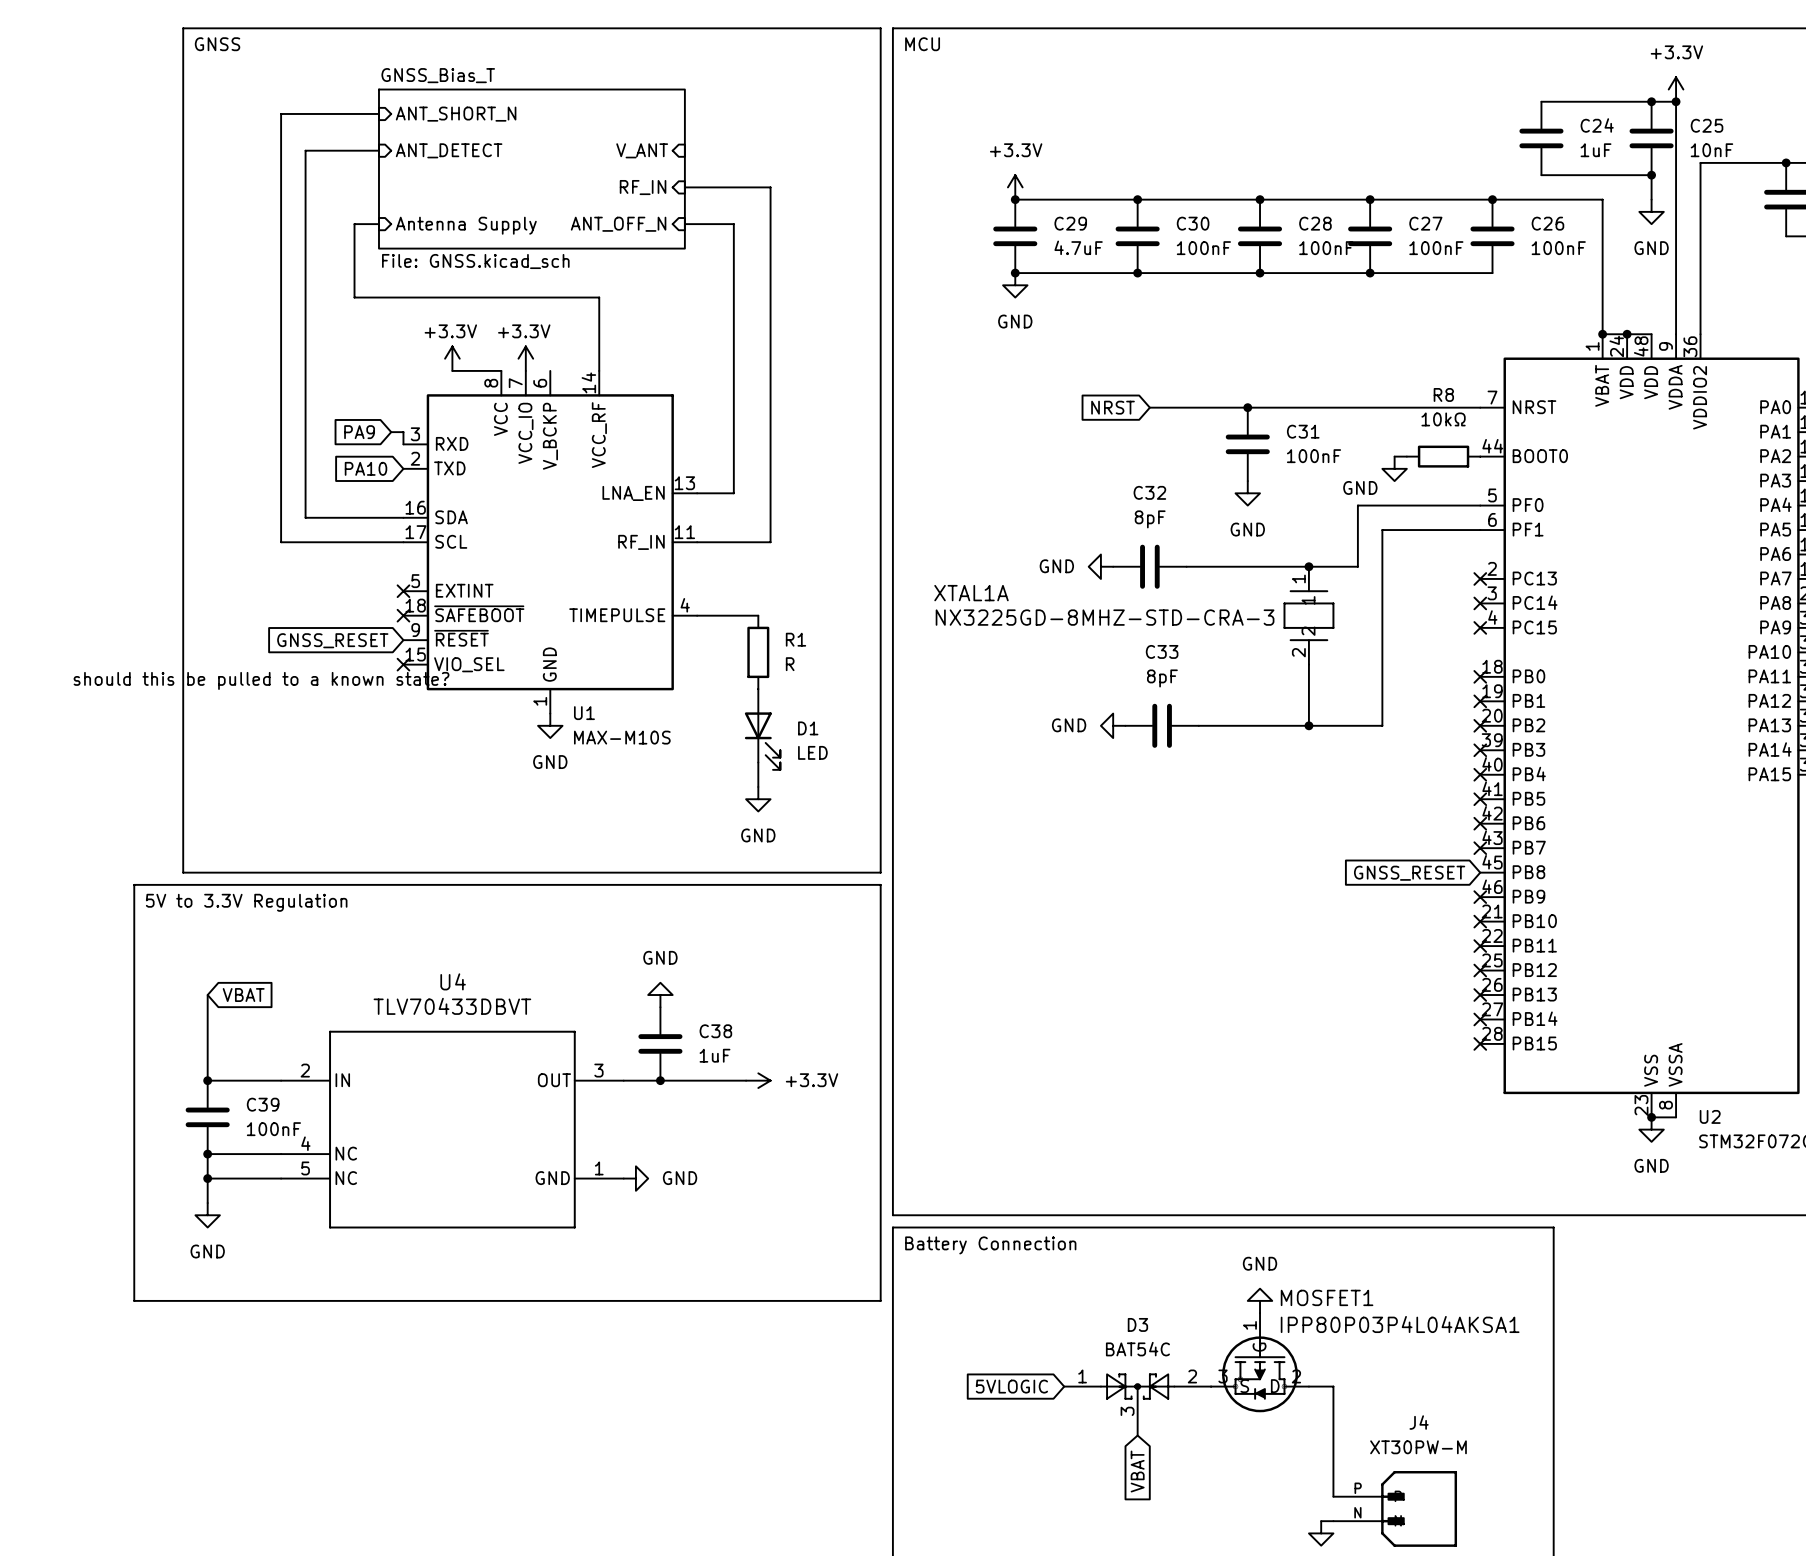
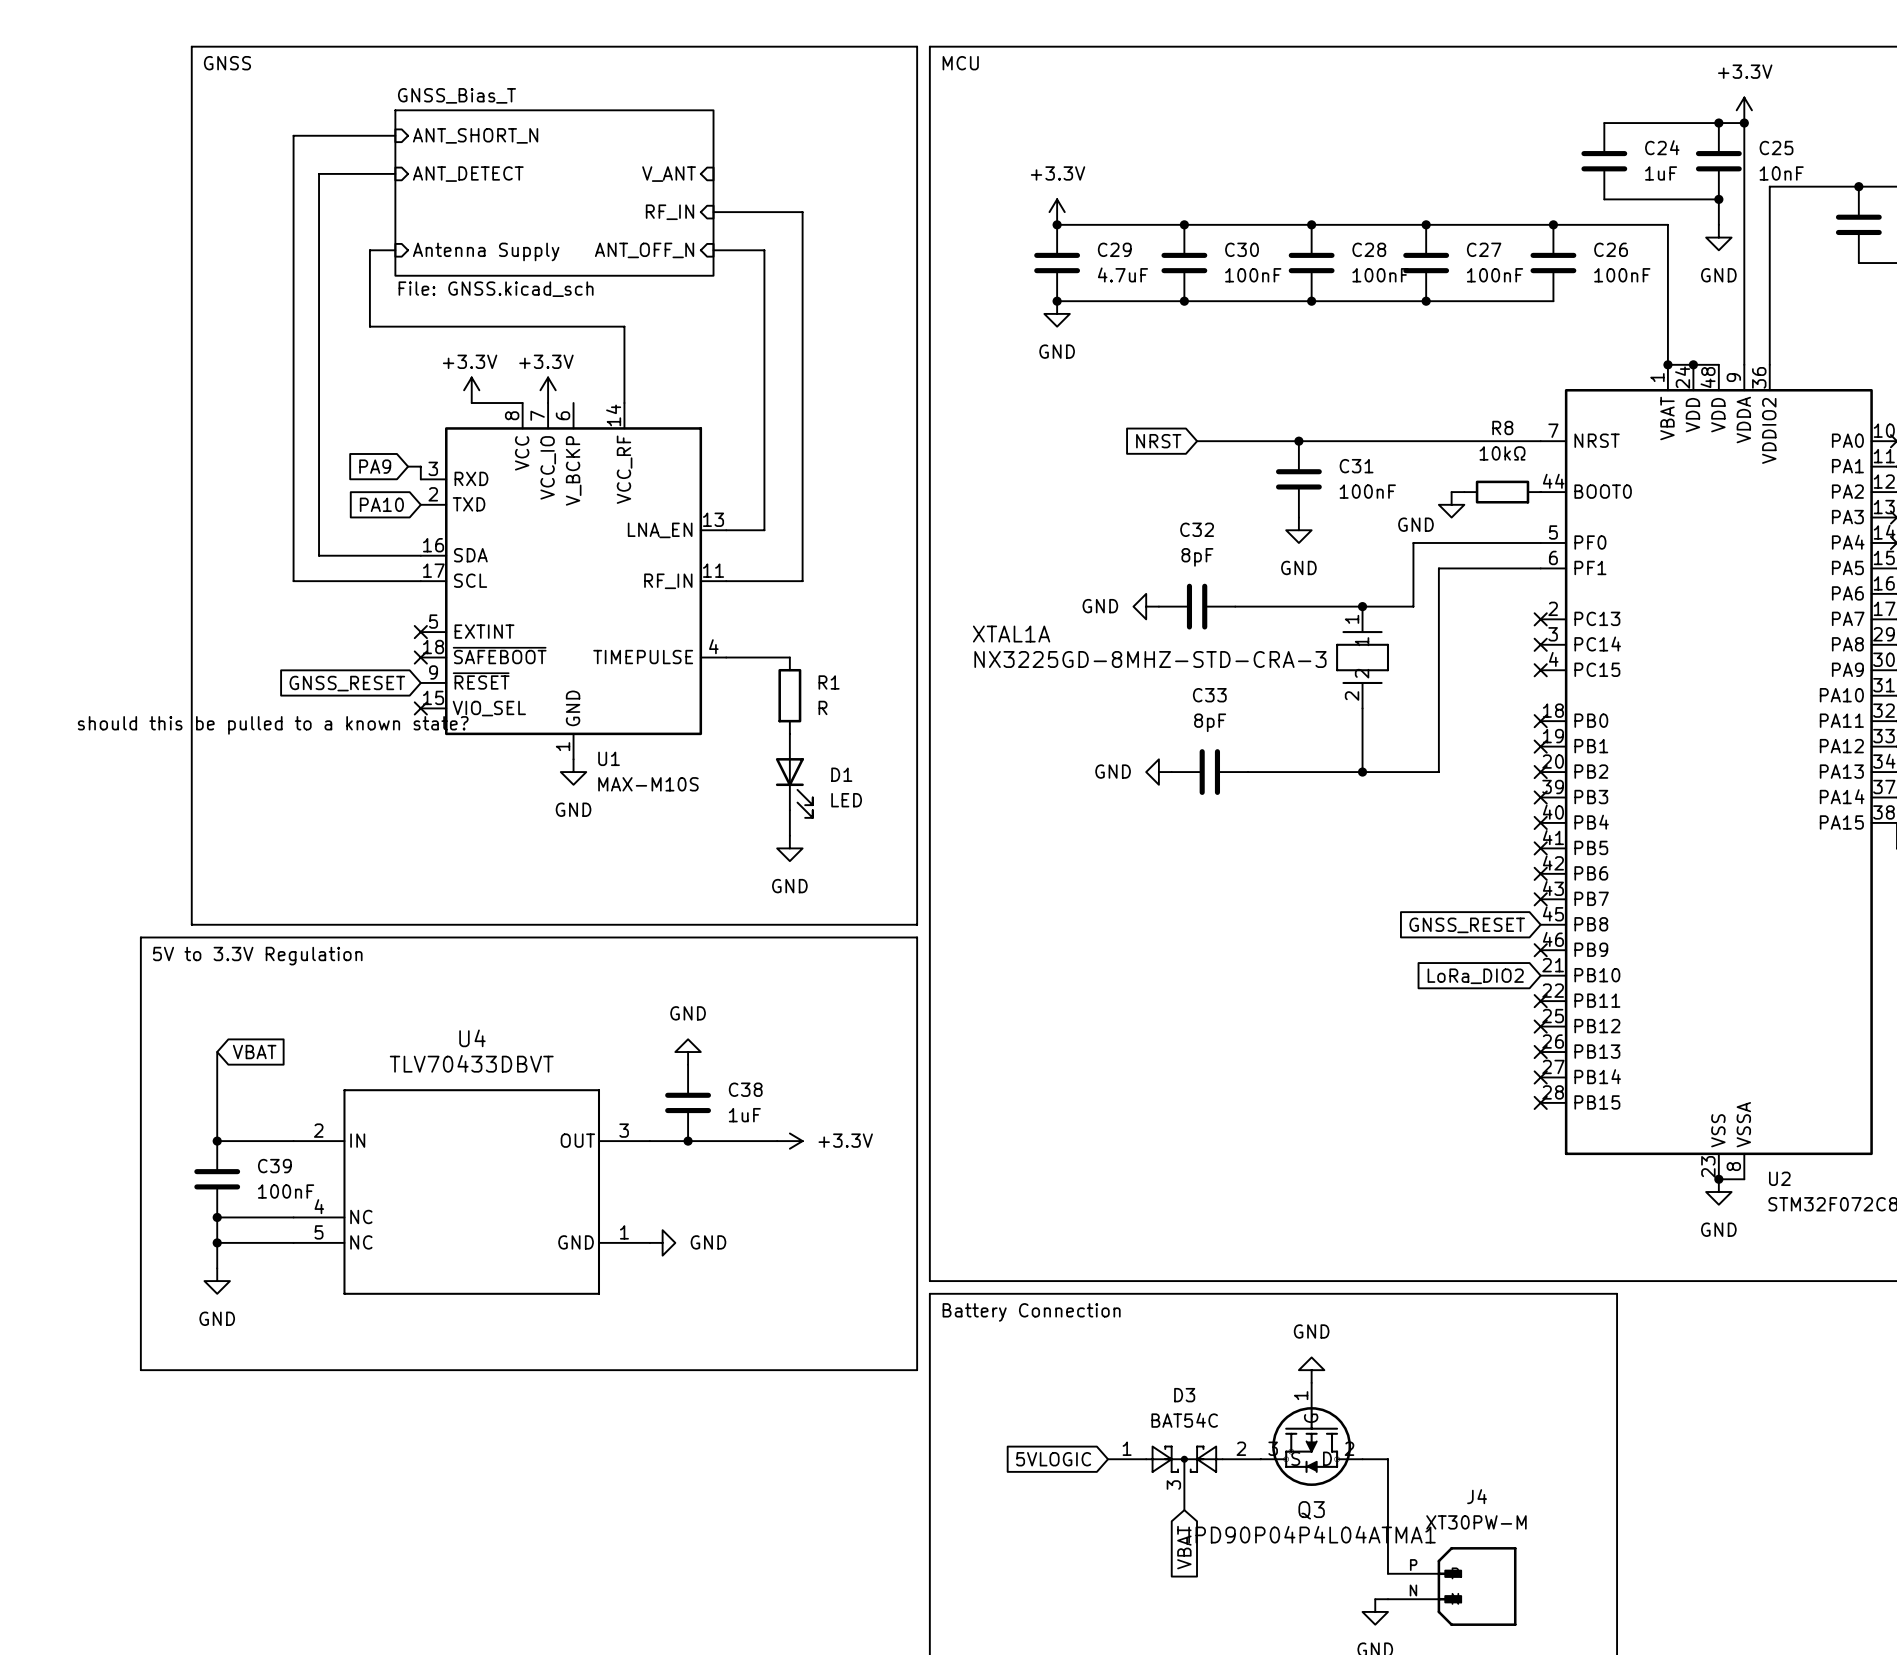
no-connect mark: (1480, 921) -> none
global label: none -> LoRa_DIO2 (1475, 976)
MOSFET1 name: MOSFET1 (1327, 1297) -> Q3 (1311, 1510)
MOSFET1 value: IPP80P03P4L04AKSA1 (1400, 1324) -> IPD90P04P4L04ATMA1 (1312, 1534)

